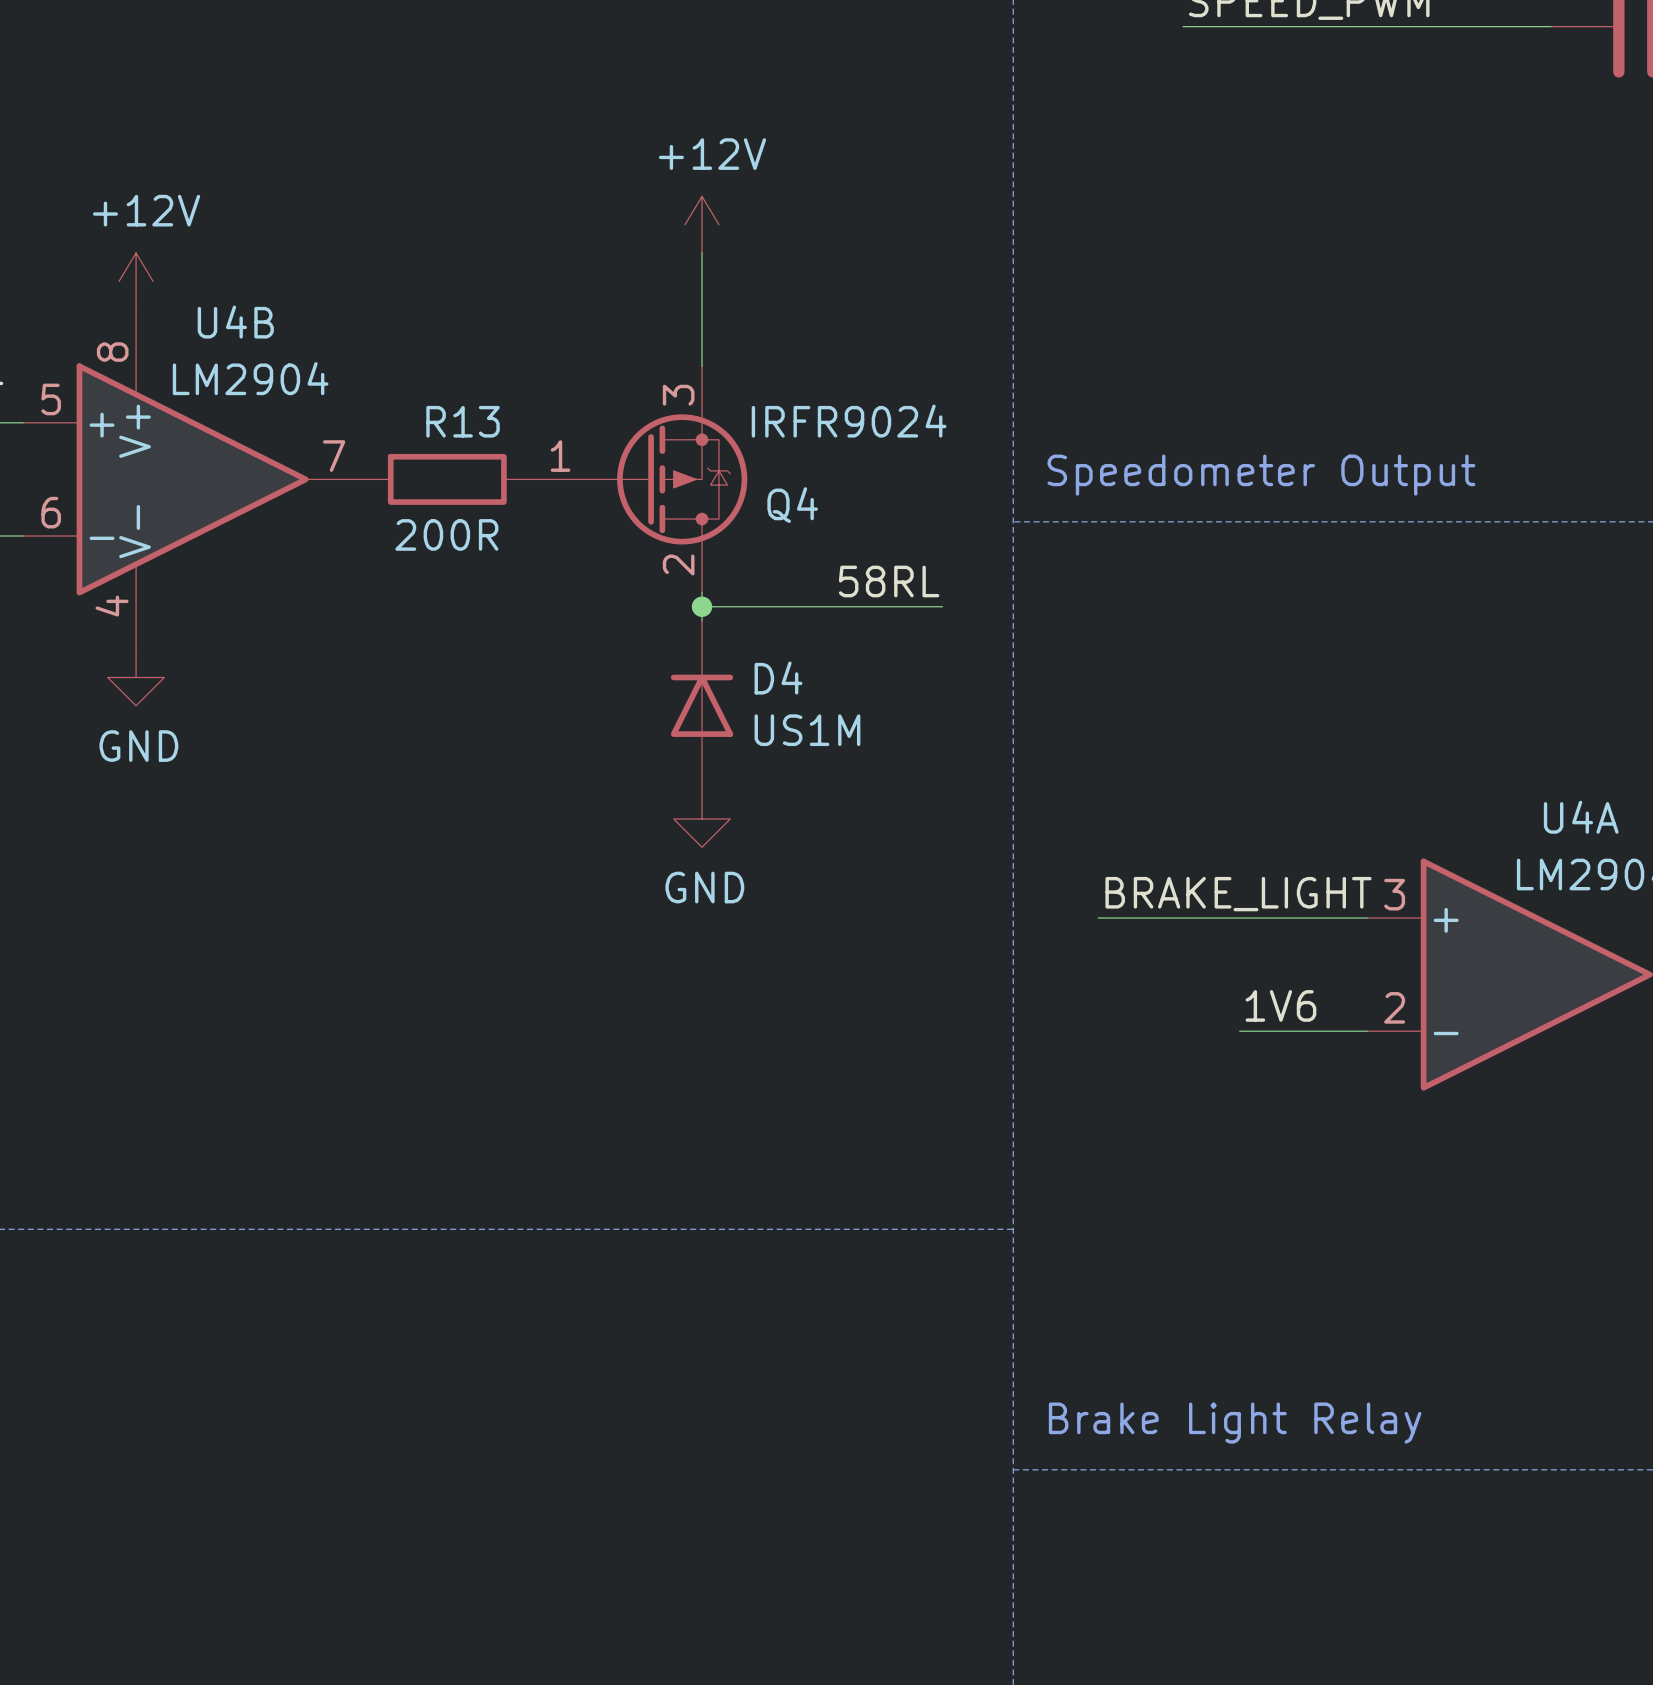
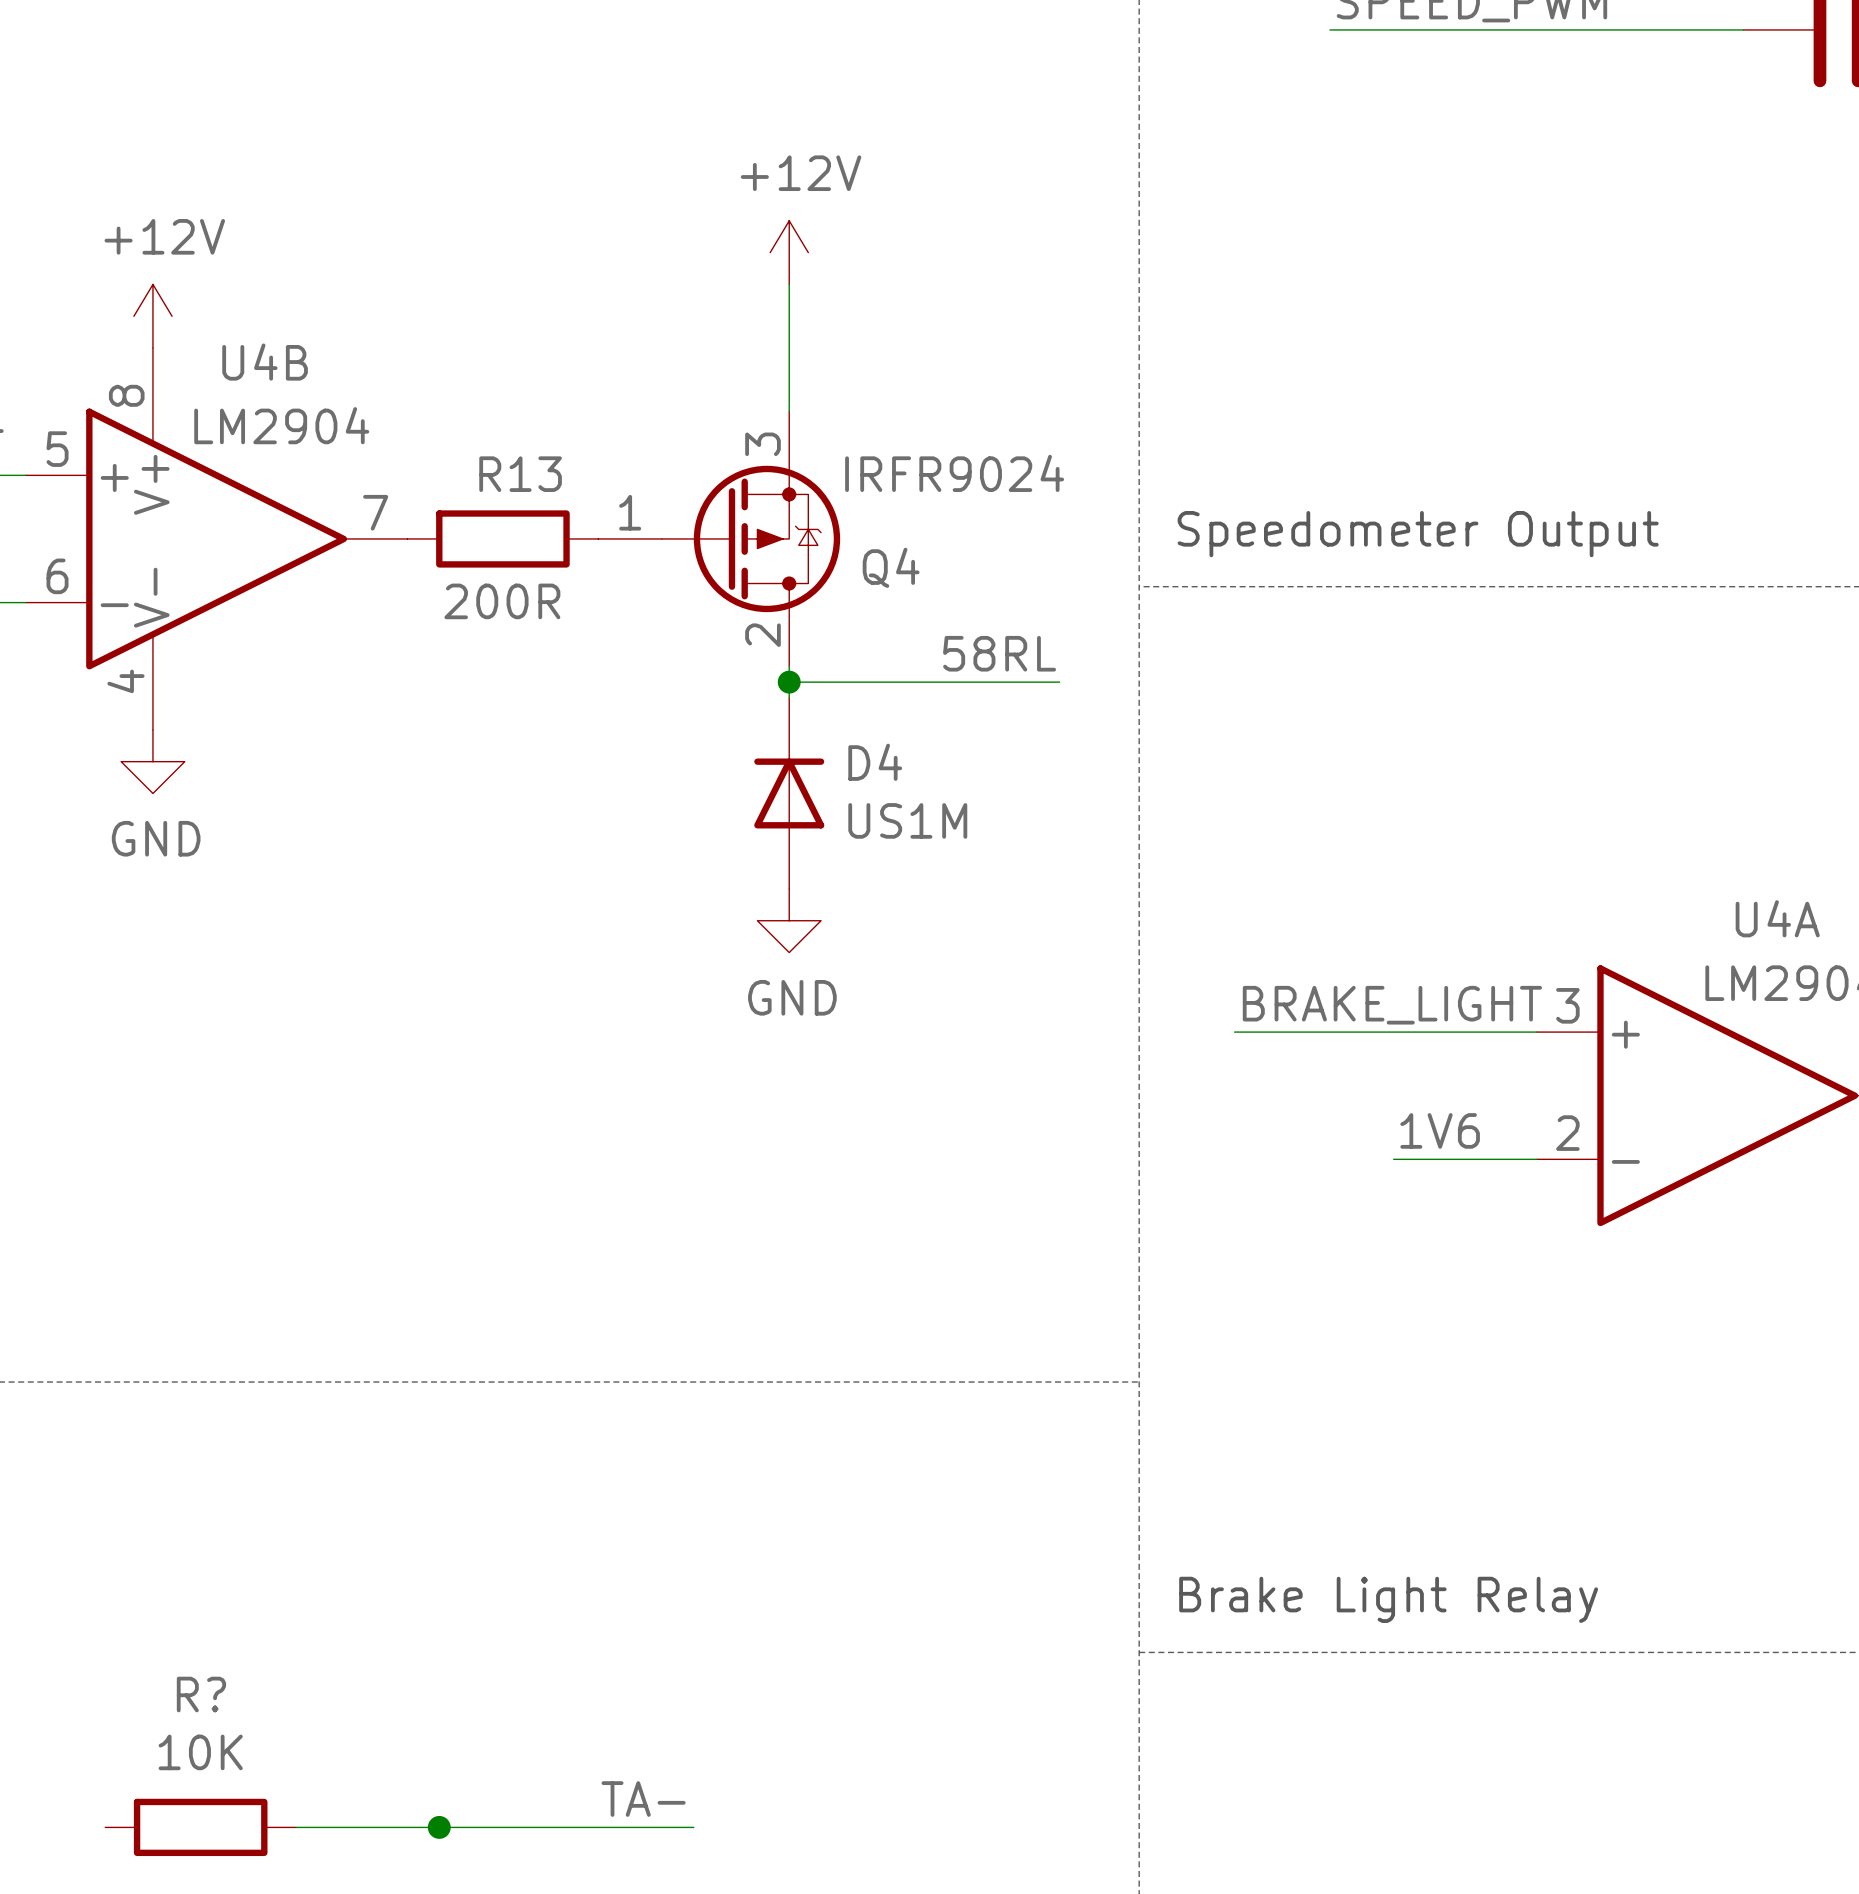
label: none -> TA- (643, 1799)
R?: none -> 10K (200, 1827)
wire: none -> (296, 1827) (693, 1827)
junction: none -> (439, 1827)

